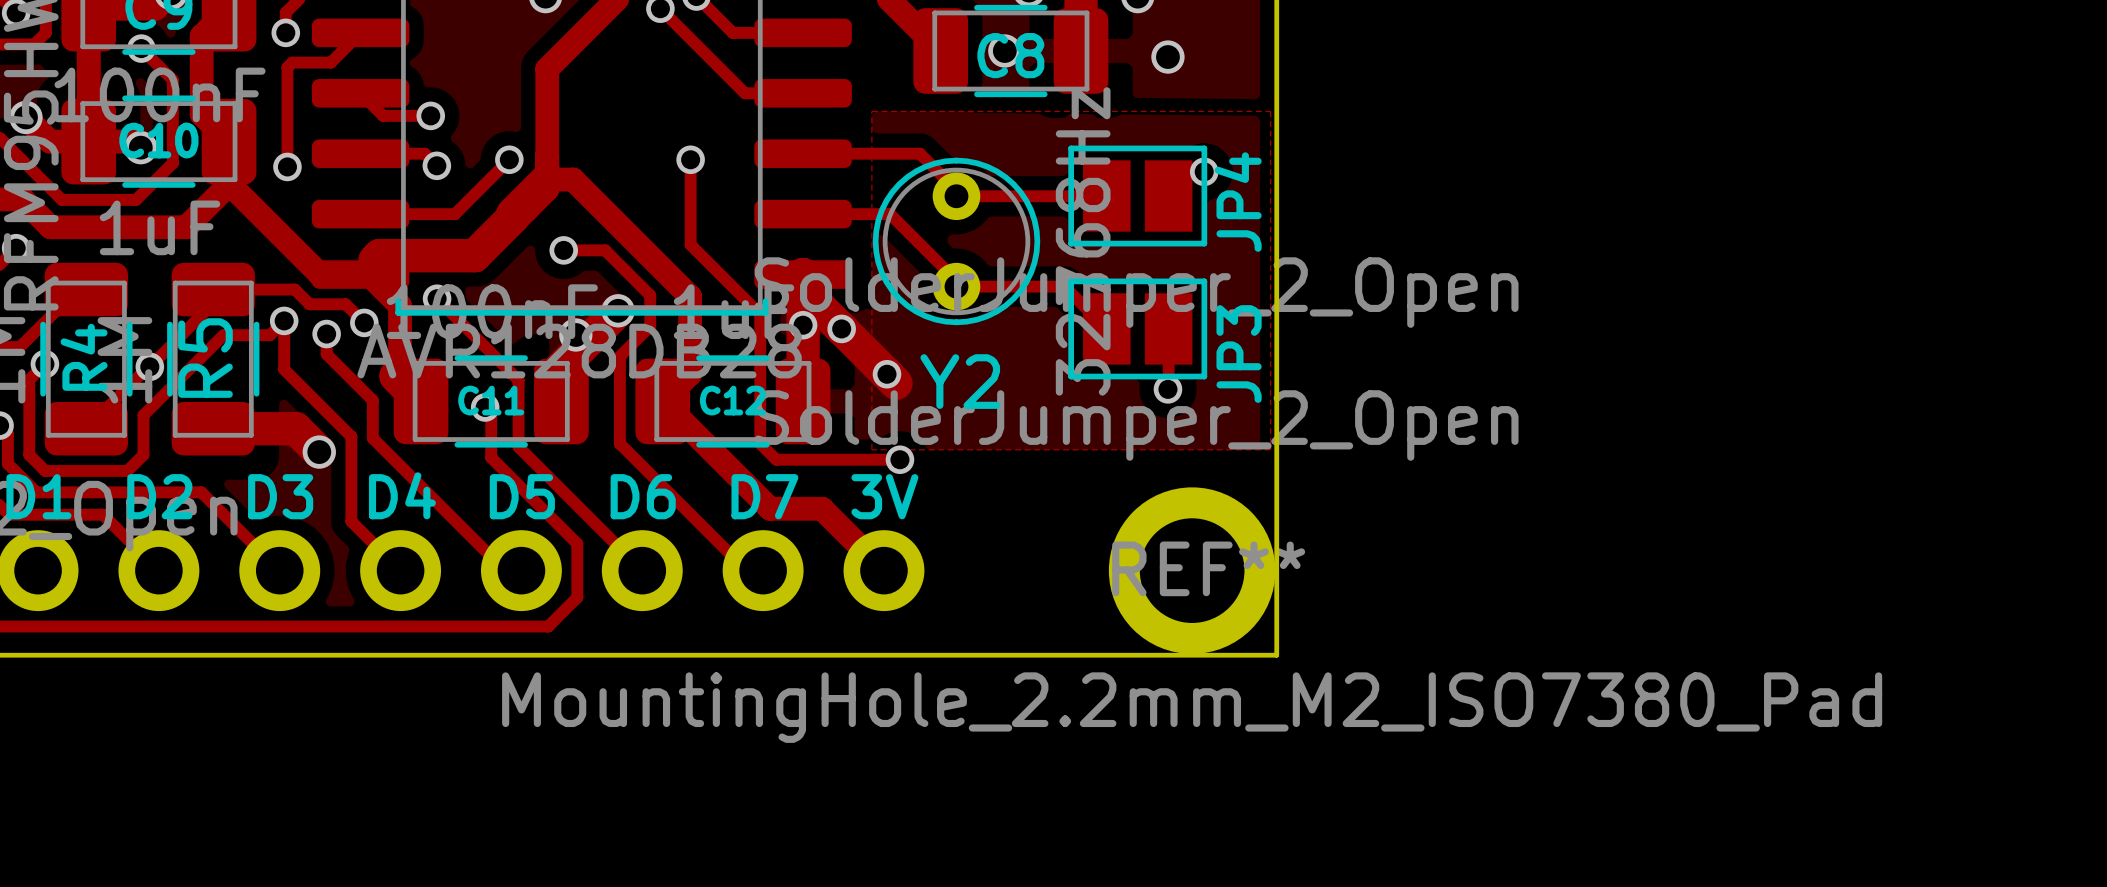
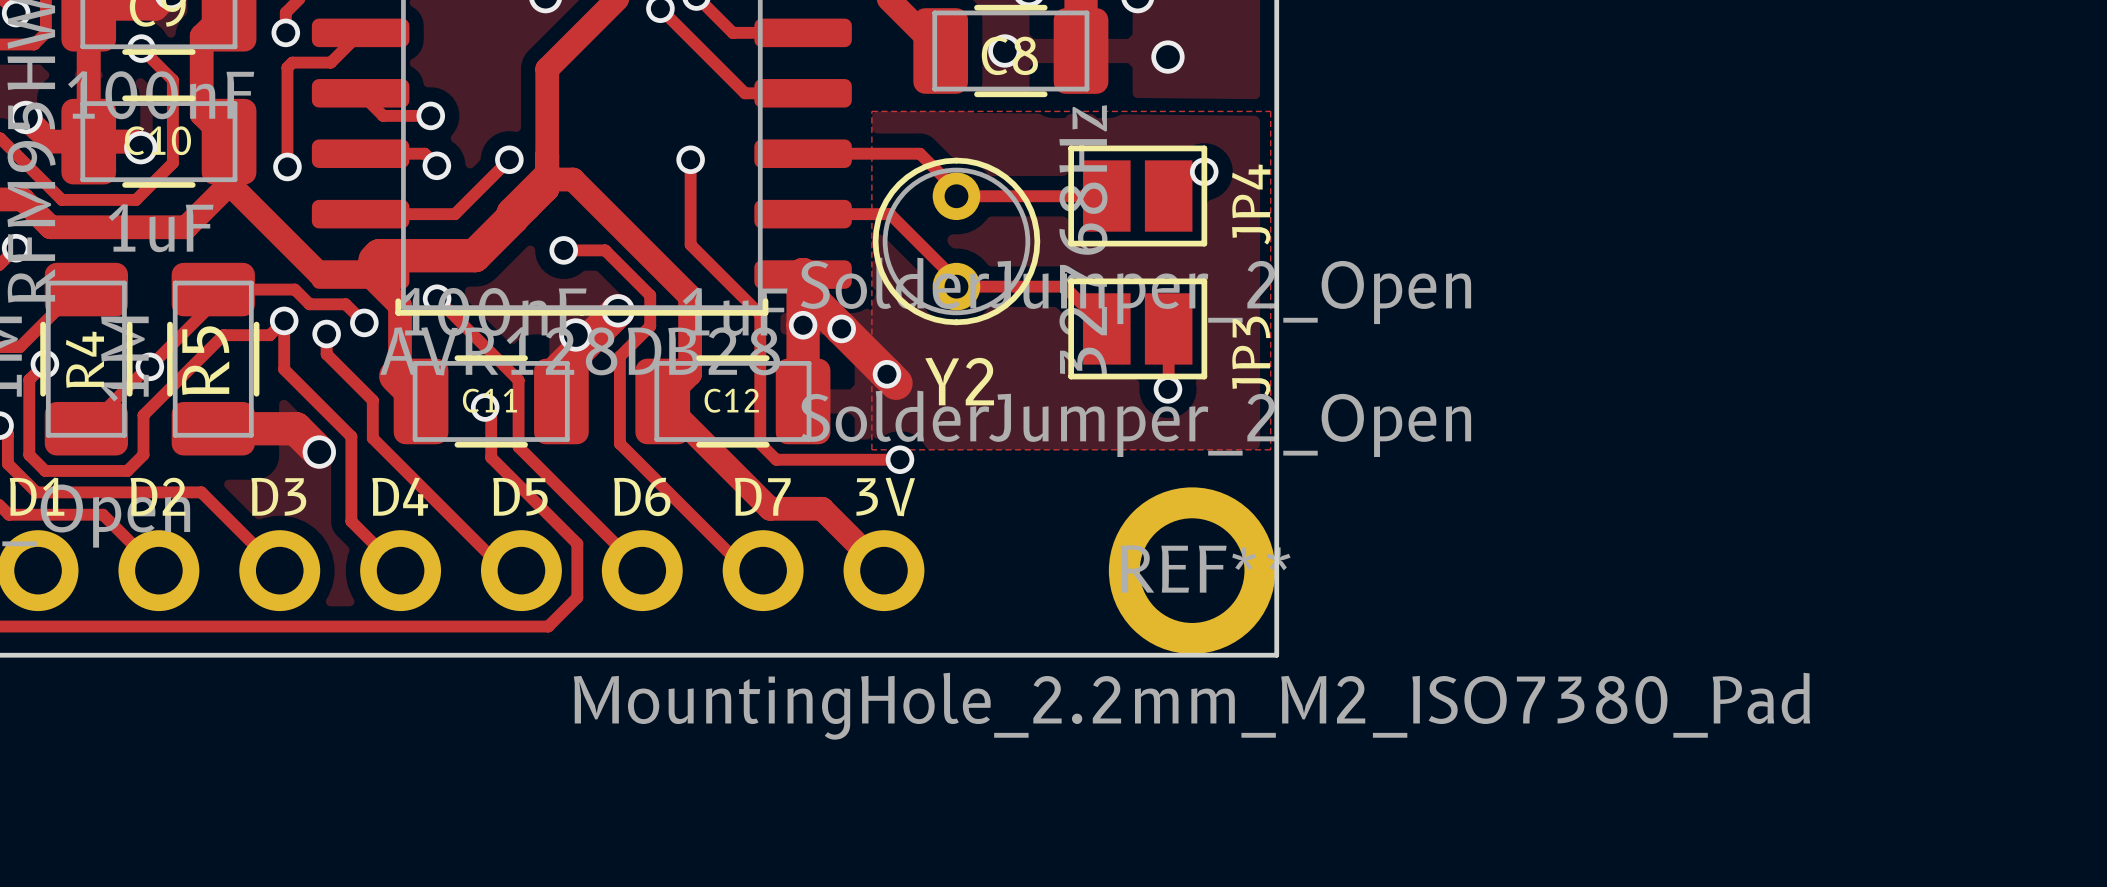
JP4 name position: JP4 (1238, 202) -> JP4 (1251, 204)
JP3 name position: JP3 (1239, 354) -> JP3 (1251, 356)

